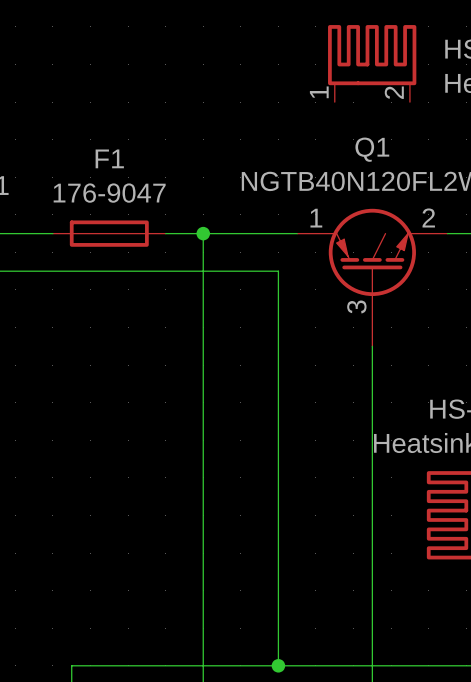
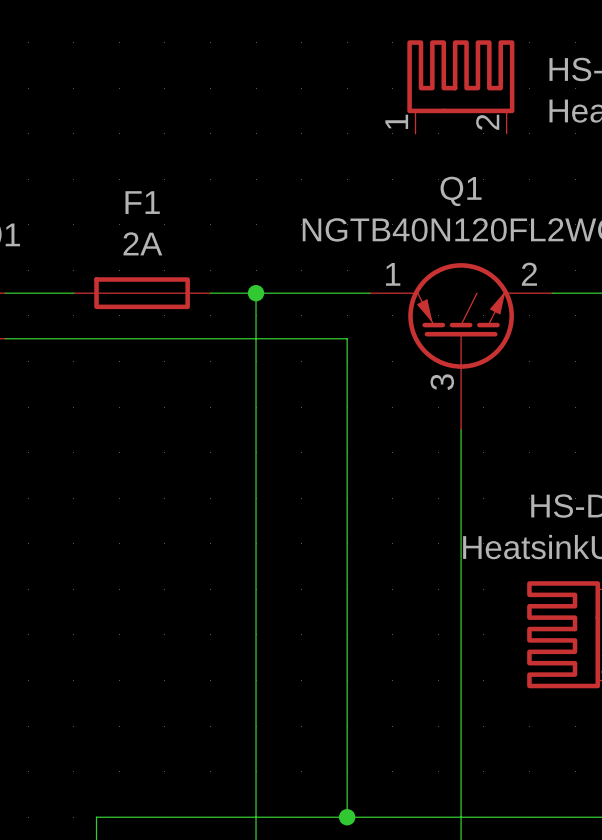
F1 value: 176-9047 (109, 193) -> 2A (142, 243)

